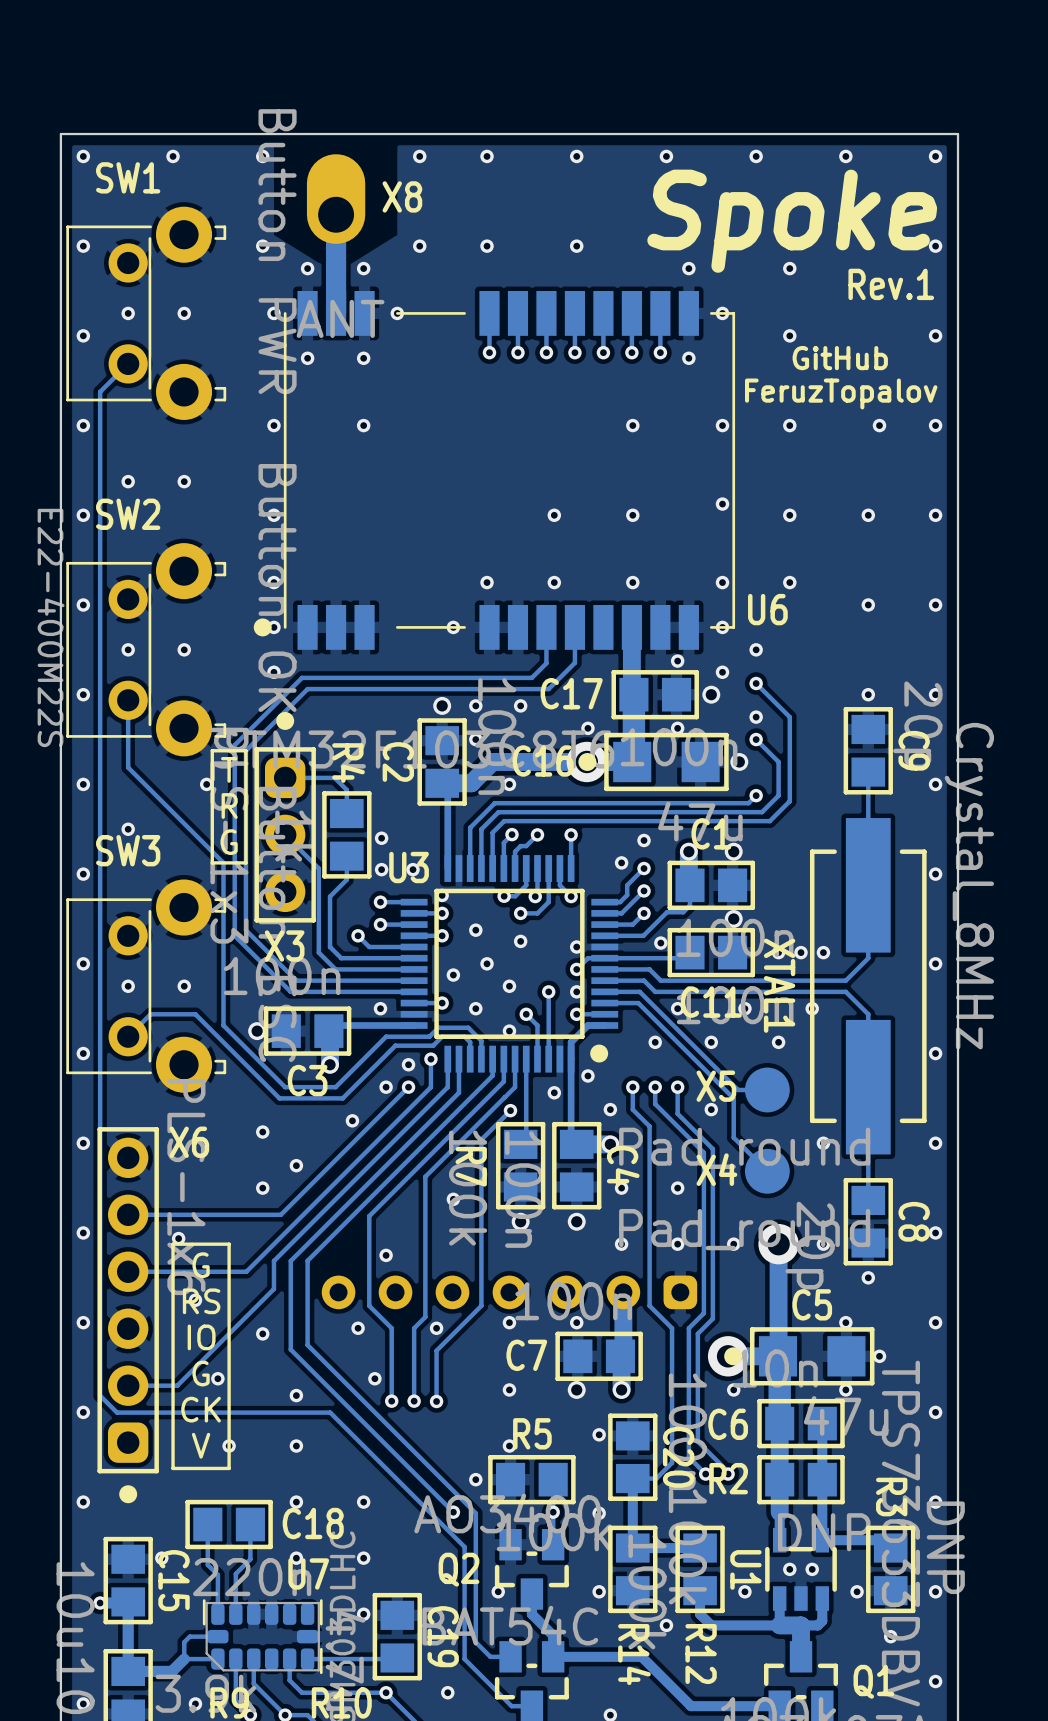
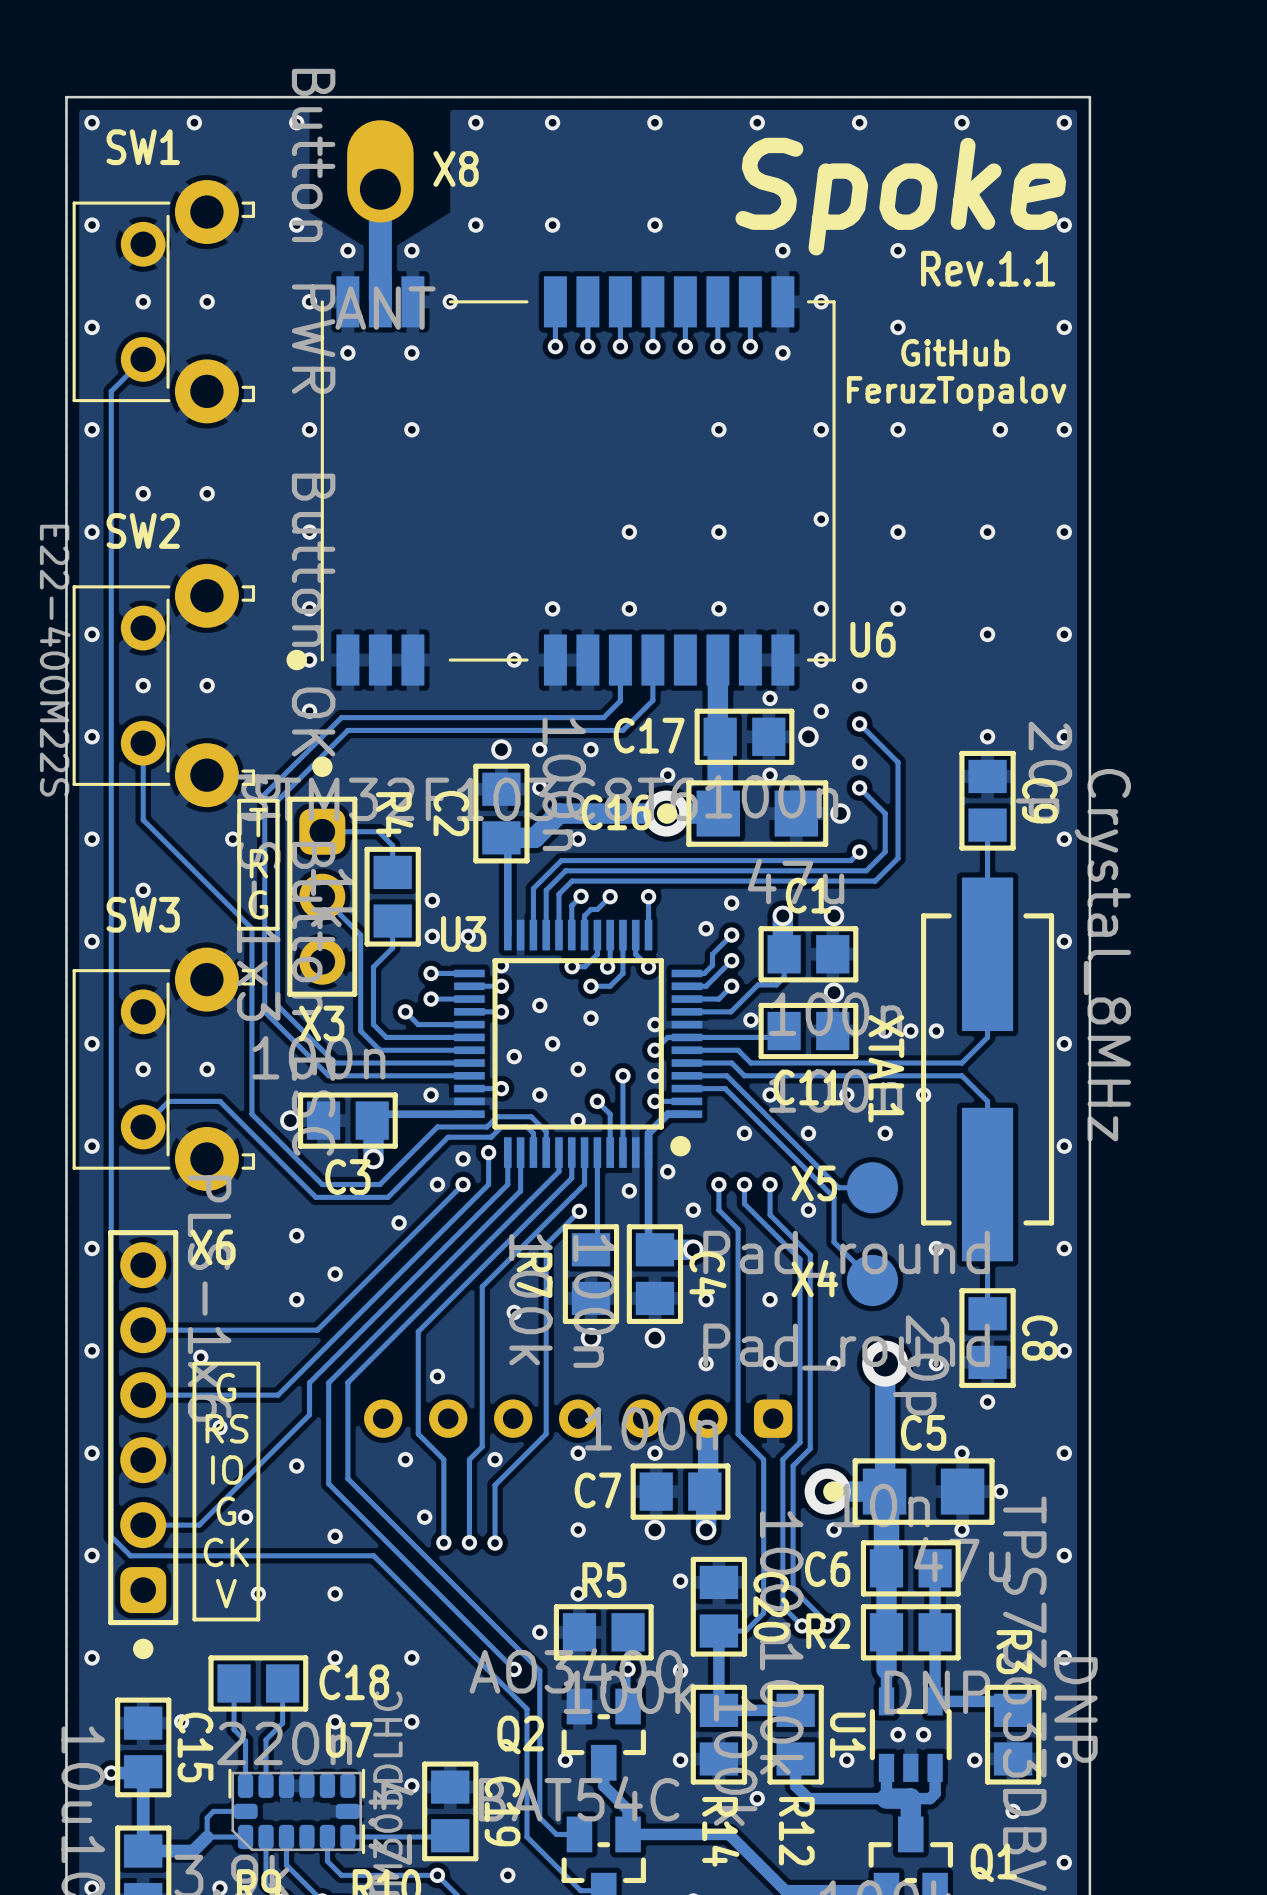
text: Rev.1 (891, 284) -> Rev.1.1 (988, 268)

